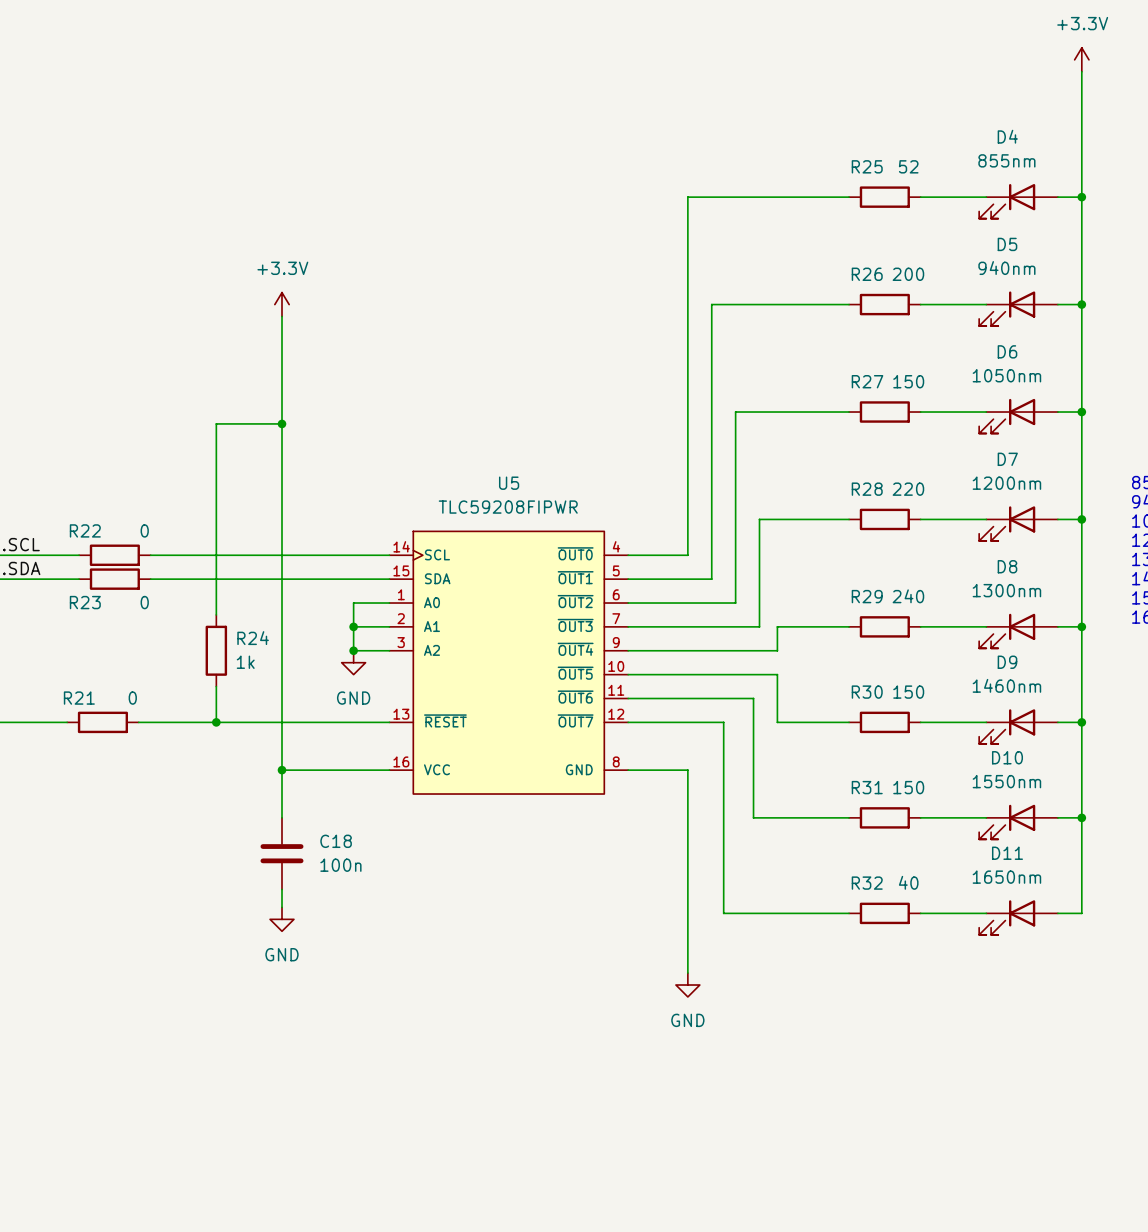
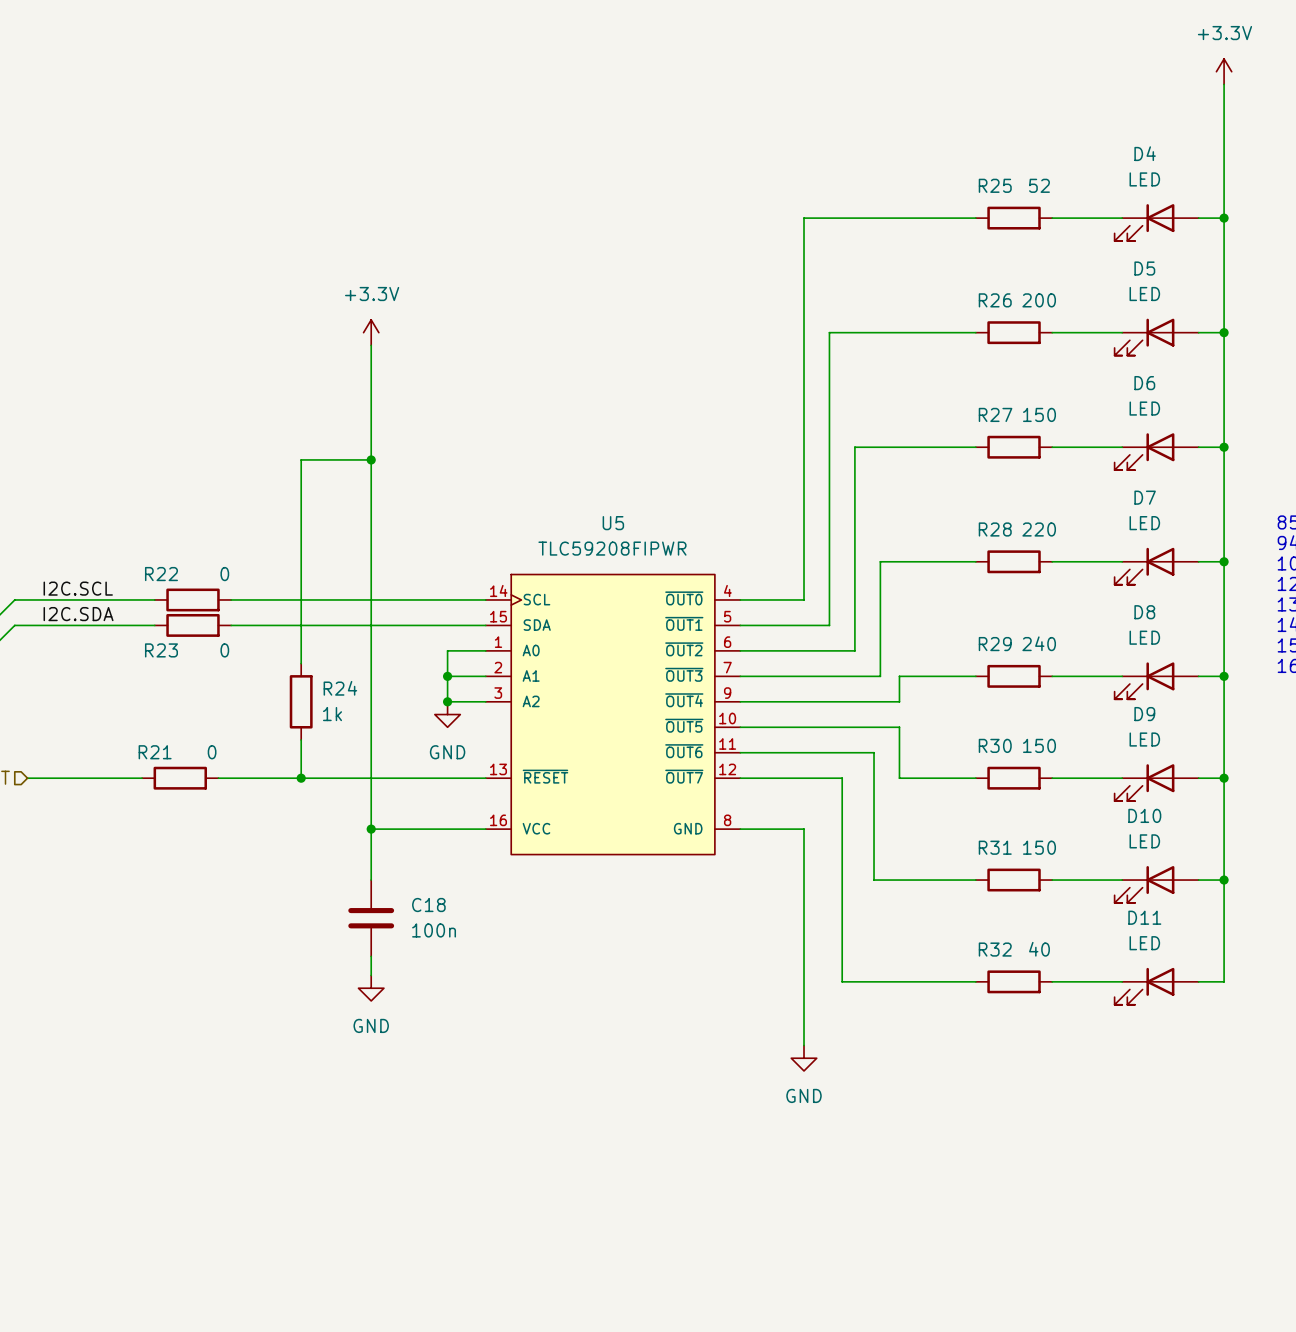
D4 value: 855nm (1006, 160) -> LED (1144, 179)
D5 value: 940nm (1006, 268) -> LED (1144, 294)
D6 value: 1050nm (1006, 375) -> LED (1144, 408)
D7 value: 1200nm (1006, 483) -> LED (1144, 523)
D8 value: 1300nm (1006, 590) -> LED (1144, 637)
D9 value: 1460nm (1006, 685) -> LED (1144, 739)
D10 value: 1550nm (1006, 781) -> LED (1144, 841)
D11 value: 1650nm (1006, 877) -> LED (1144, 943)

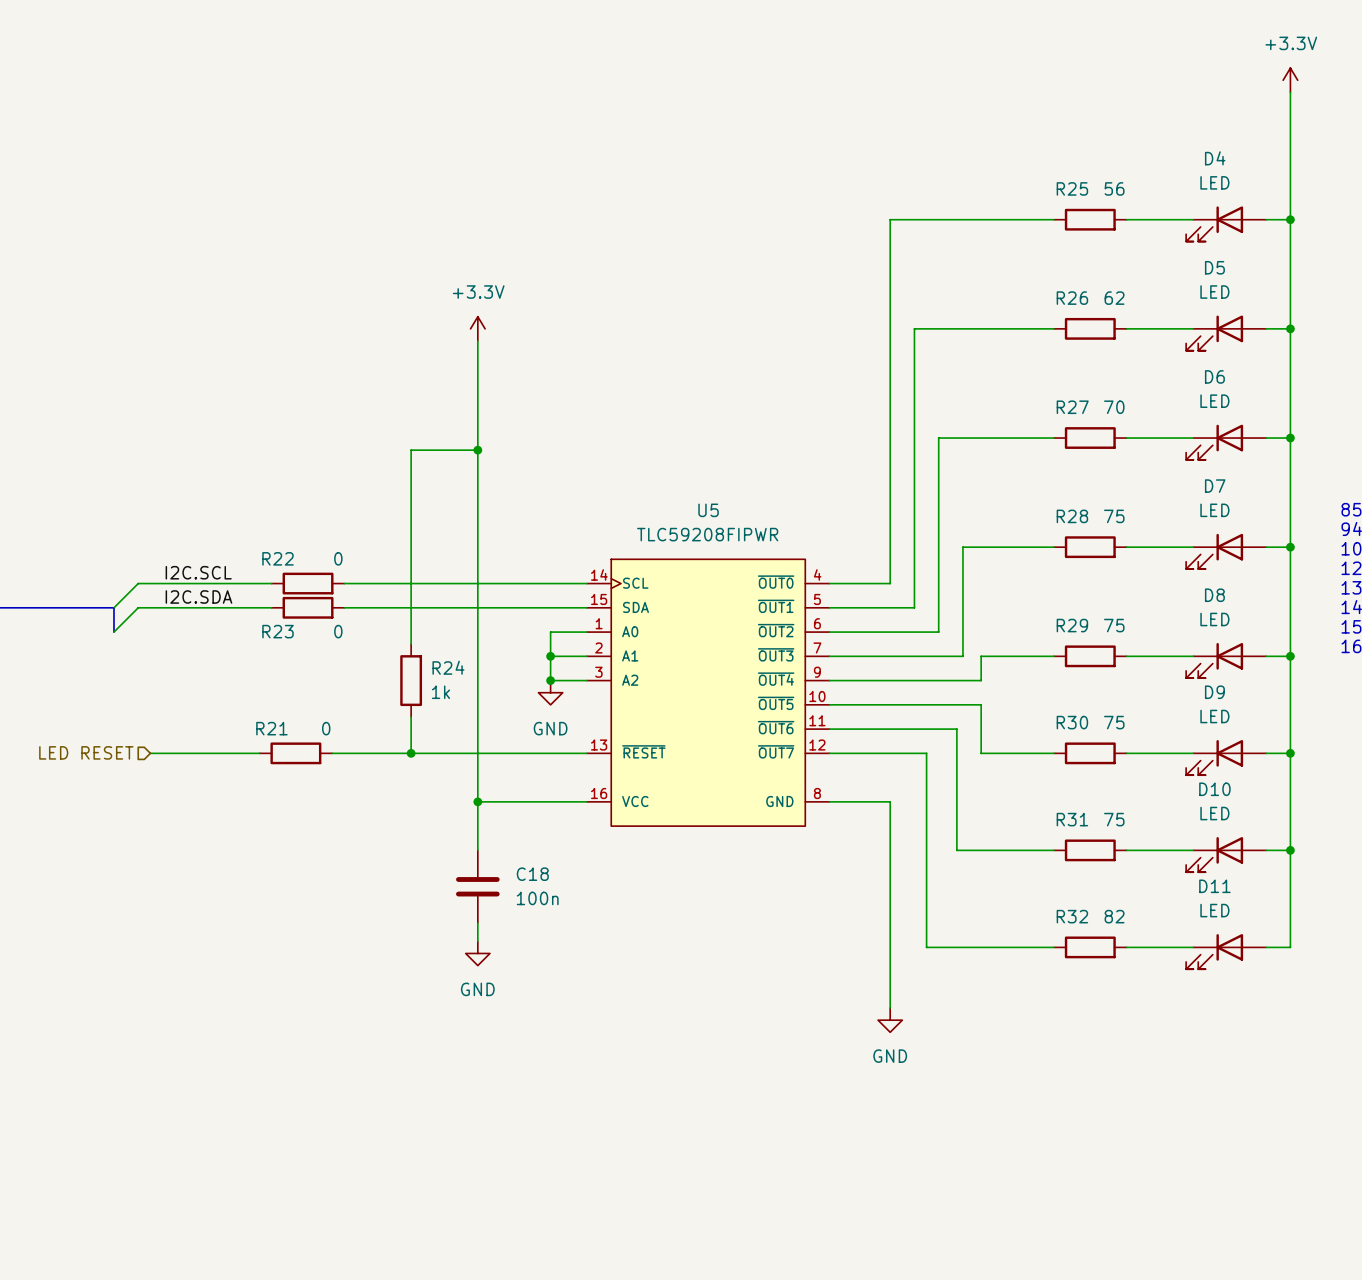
R25 value: 52 (1039, 185) -> 56 (1114, 188)
R26 value: 200 (1039, 300) -> 62 (1114, 298)
R27 value: 150 (1039, 414) -> 70 (1114, 407)
R28 value: 220 (1039, 529) -> 75 (1114, 516)
R29 value: 240 (1039, 643) -> 75 (1114, 625)
R30 value: 150 (1039, 745) -> 75 (1114, 722)
R31 value: 150 (1039, 847) -> 75 (1114, 819)
R32 value: 40 (1039, 949) -> 82 (1114, 916)

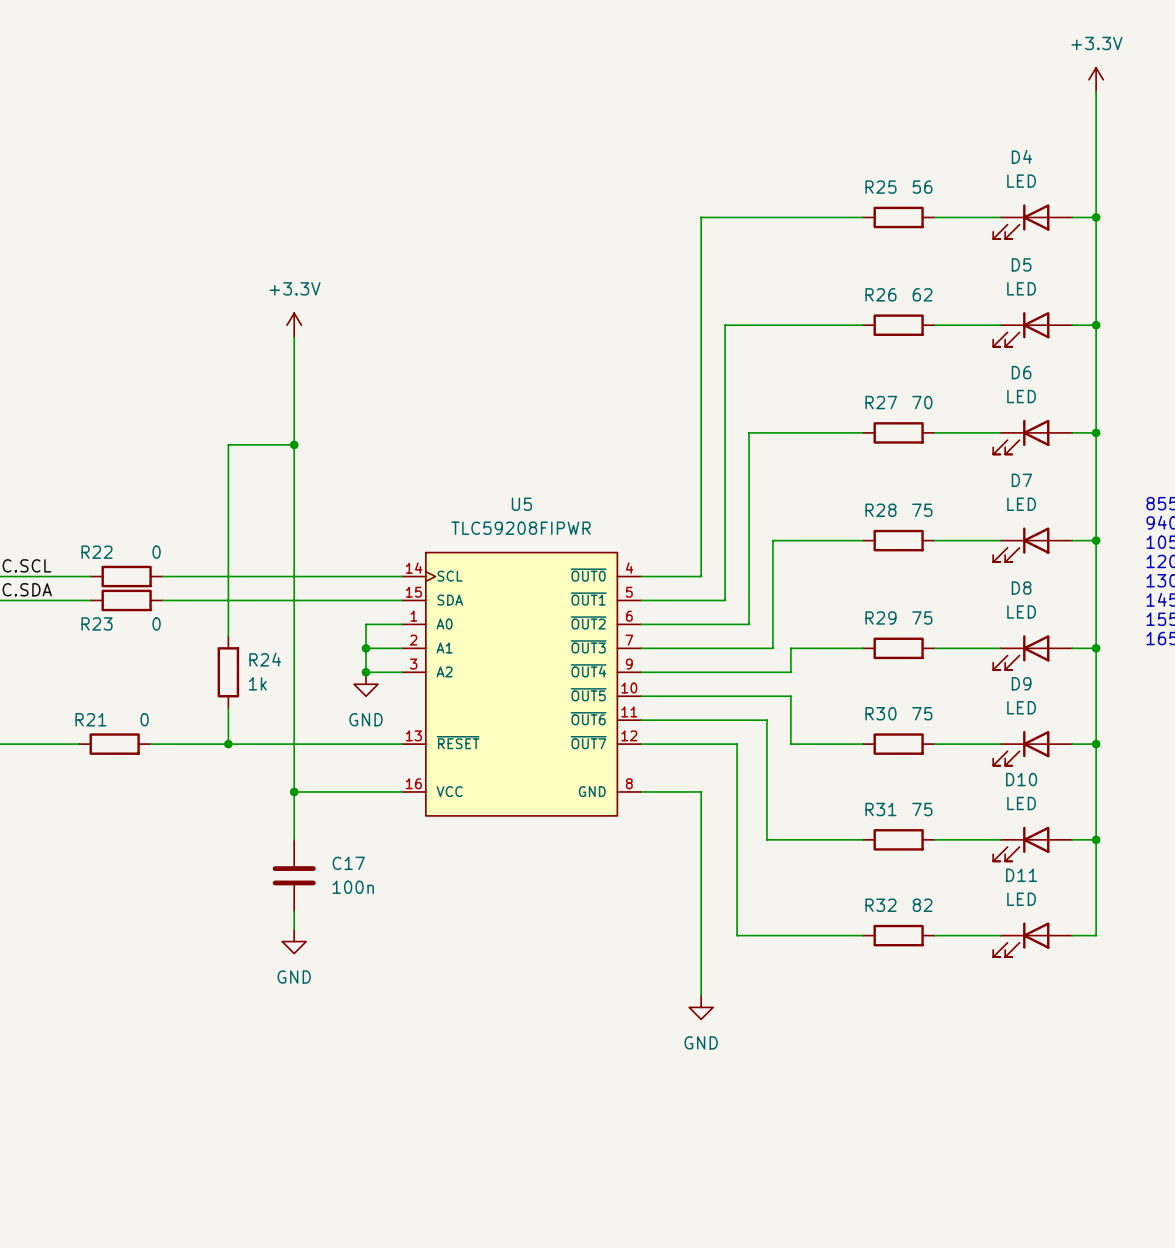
C18 name: C18 (532, 874) -> C17 (348, 863)

